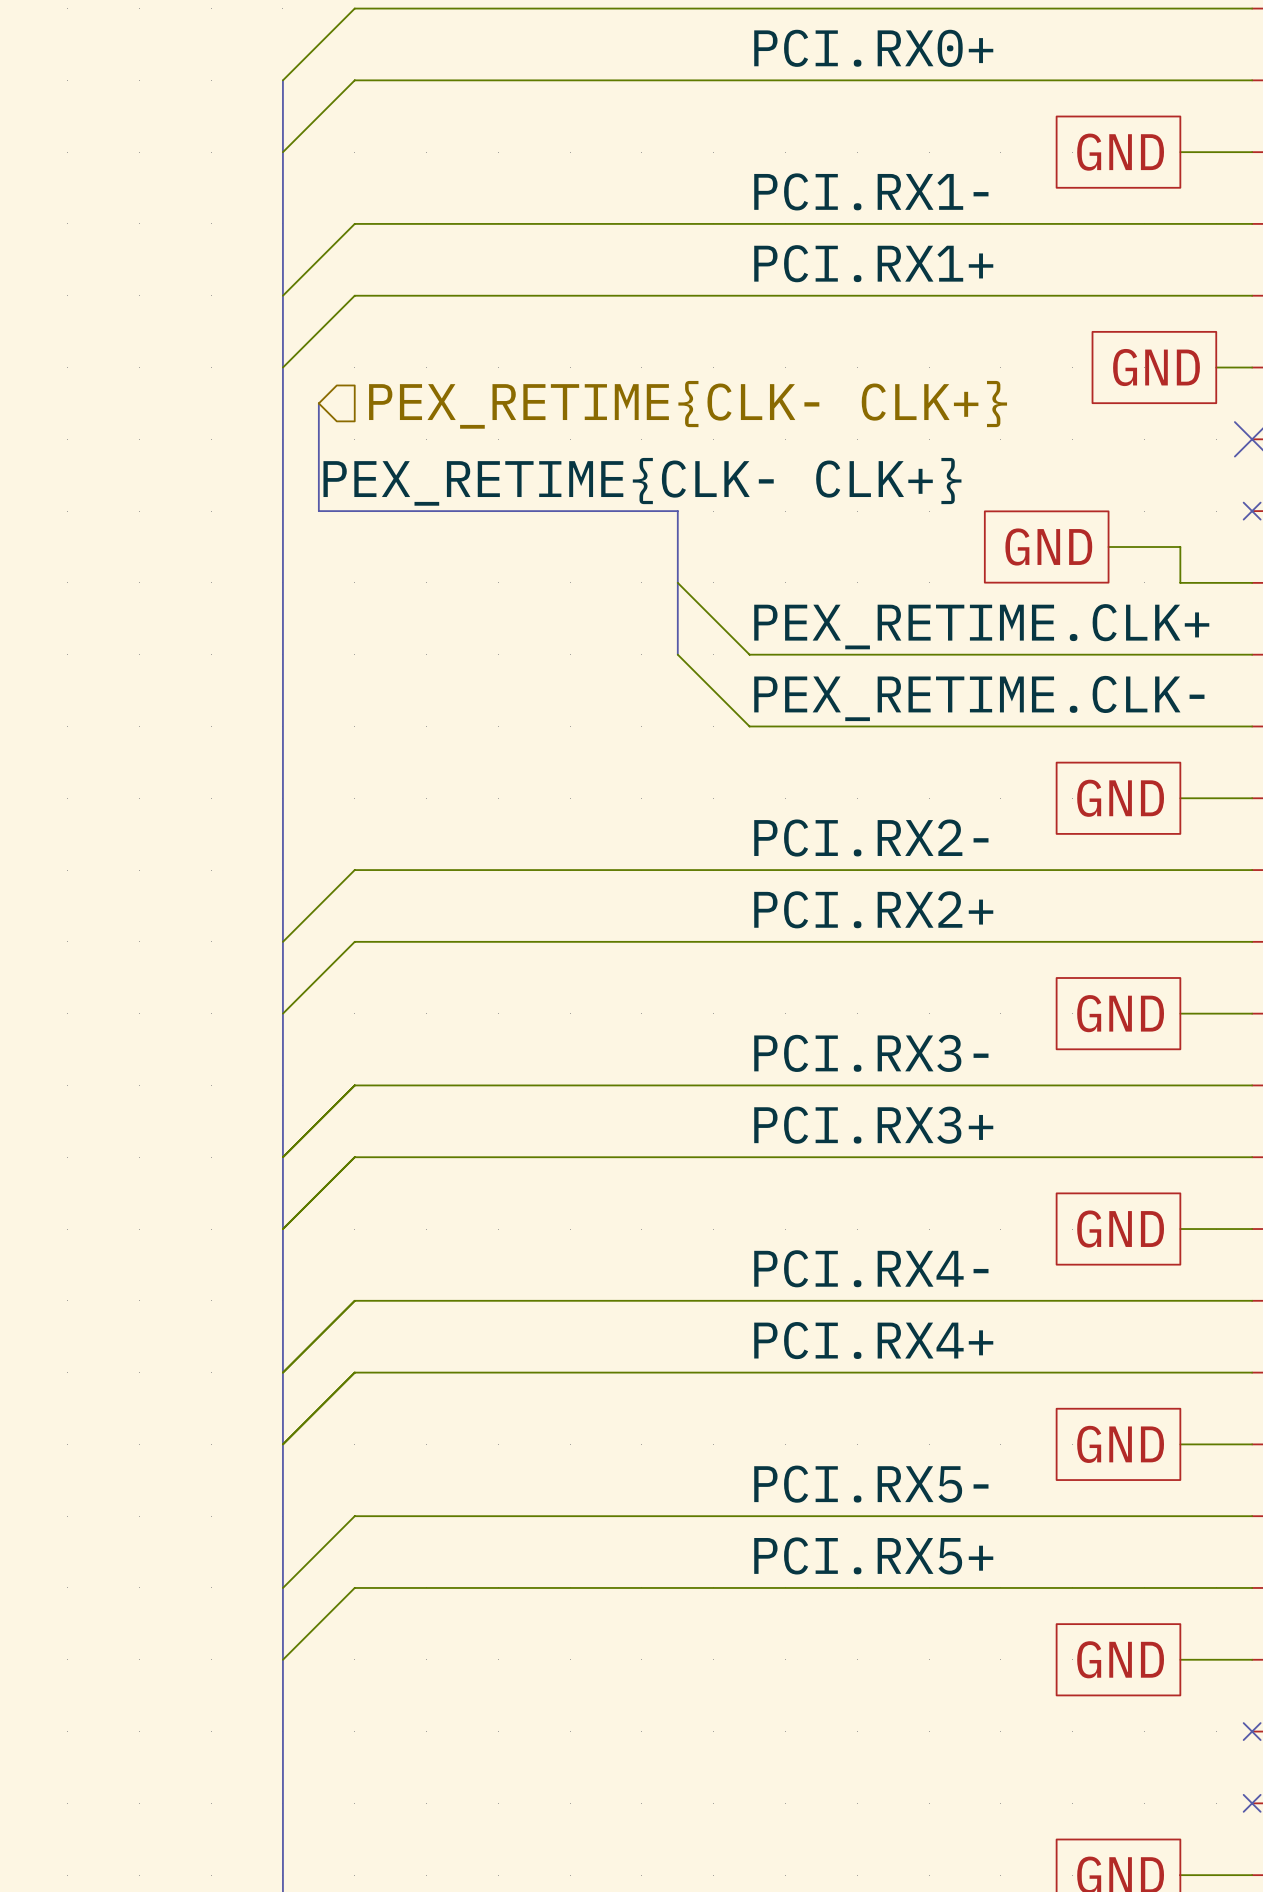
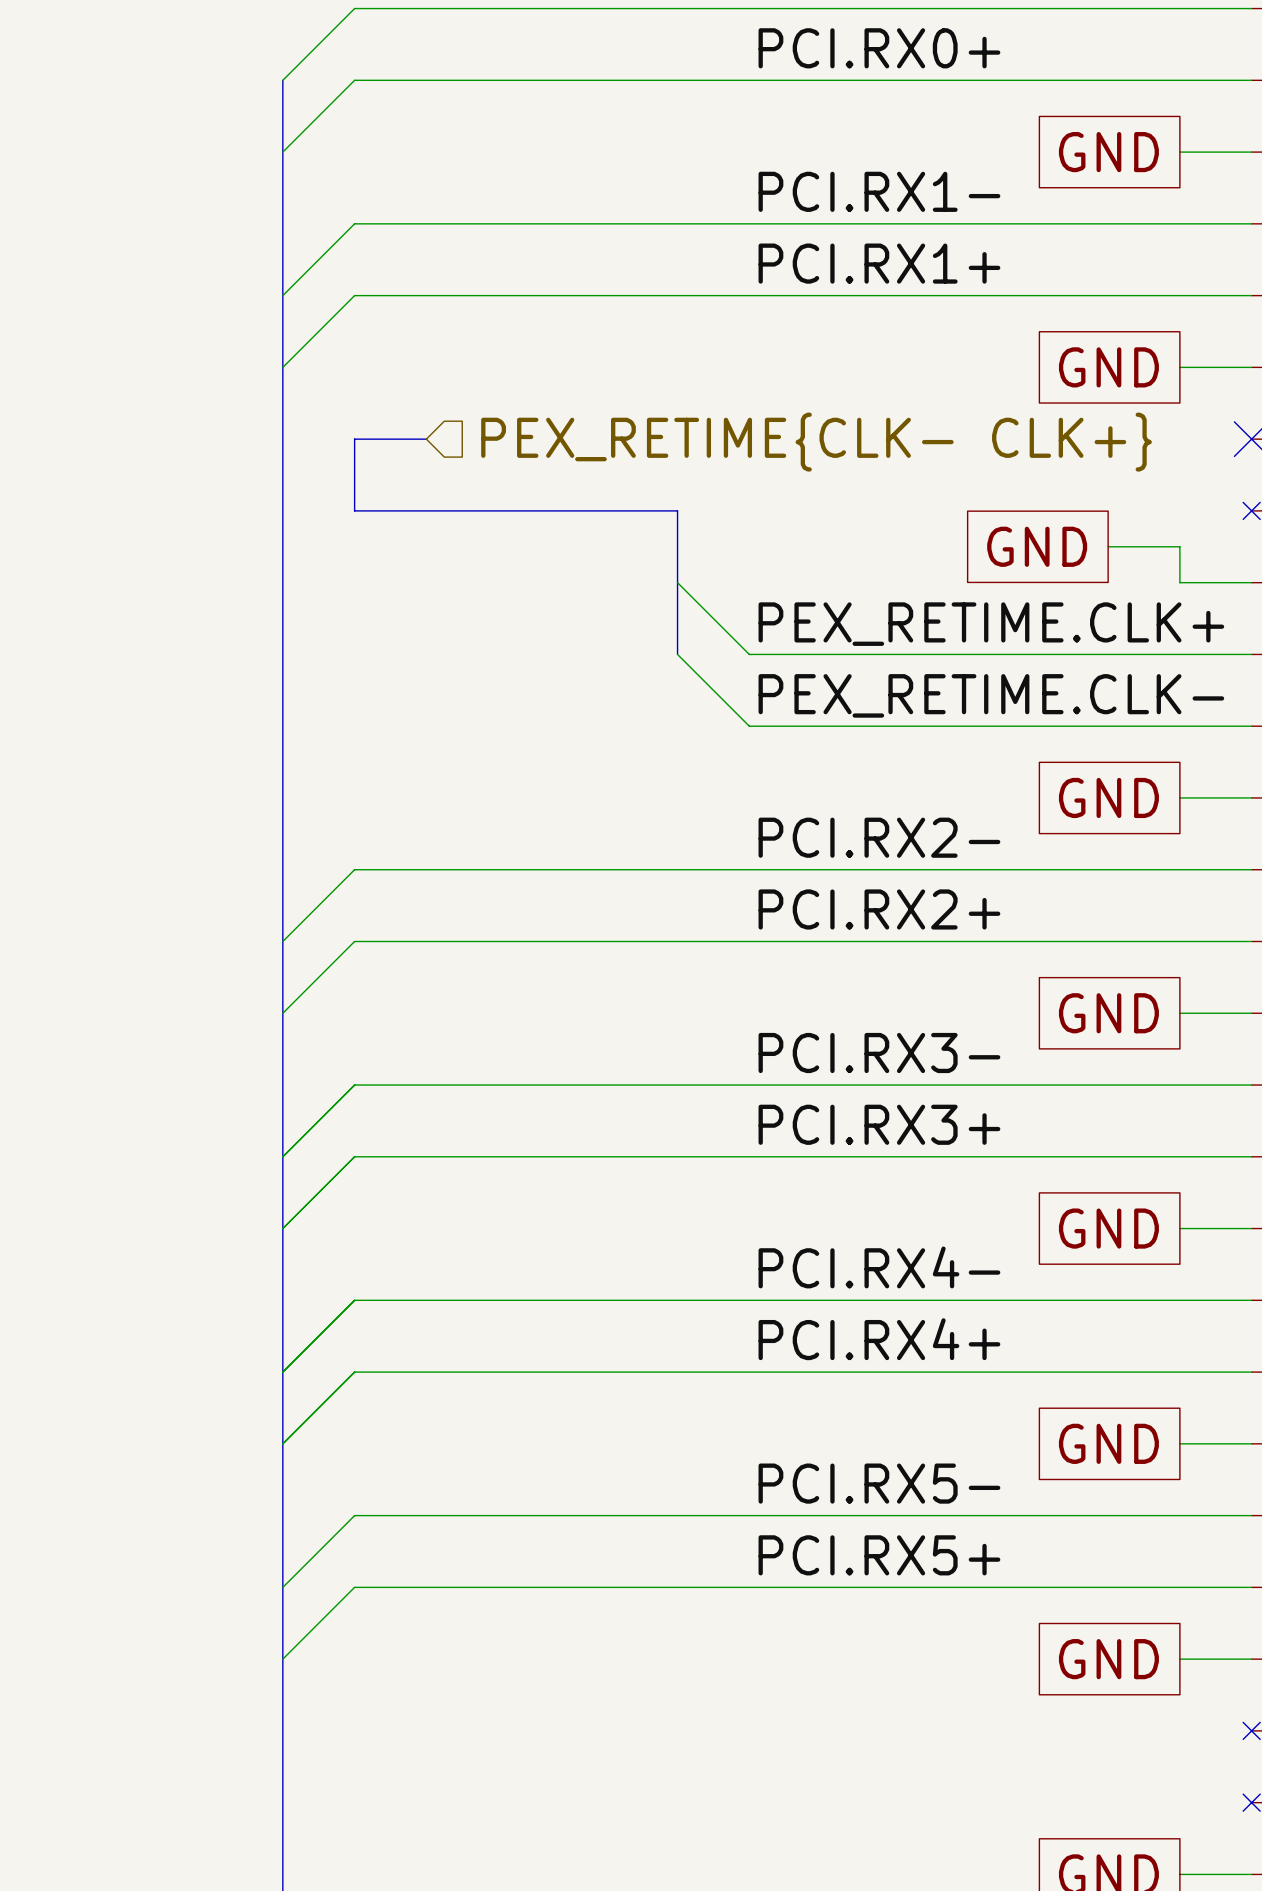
global label position: GND (1156, 367) -> GND (1108, 367)
wire: none -> (1179, 367) (1215, 367)
bus: (318, 403) (318, 511) (354, 511) -> (426, 439) (354, 439) (354, 510)
hierarchical label position: PEX_RETIME{CLK- CLK+} (688, 404) -> PEX_RETIME{CLK- CLK+} (816, 442)
label: PEX_RETIME{CLK- CLK+} (642, 481) -> none

